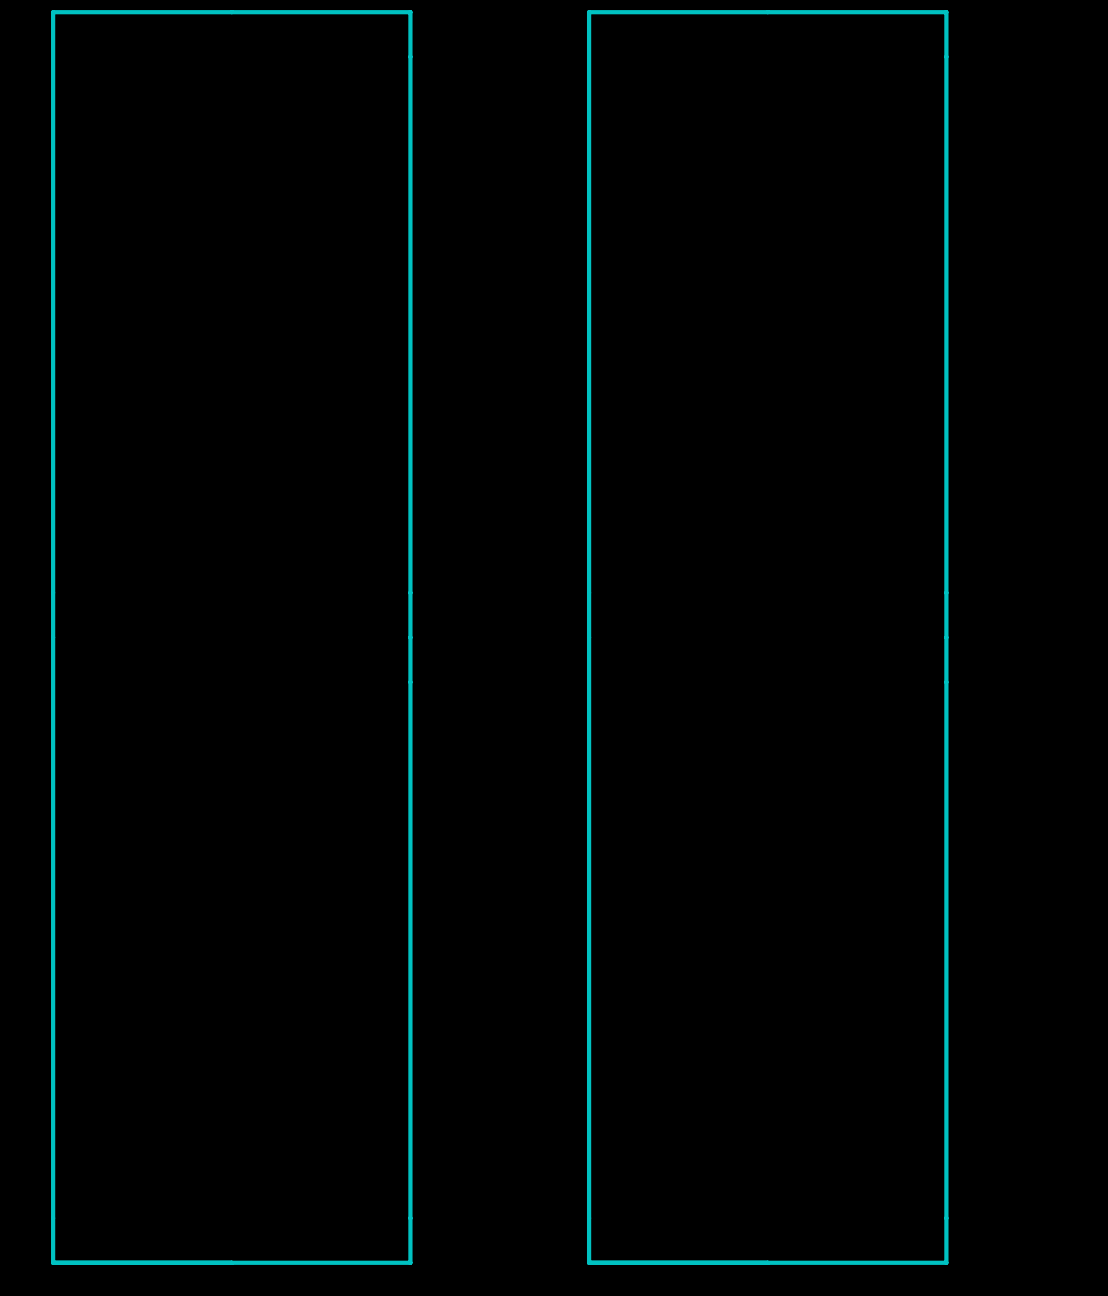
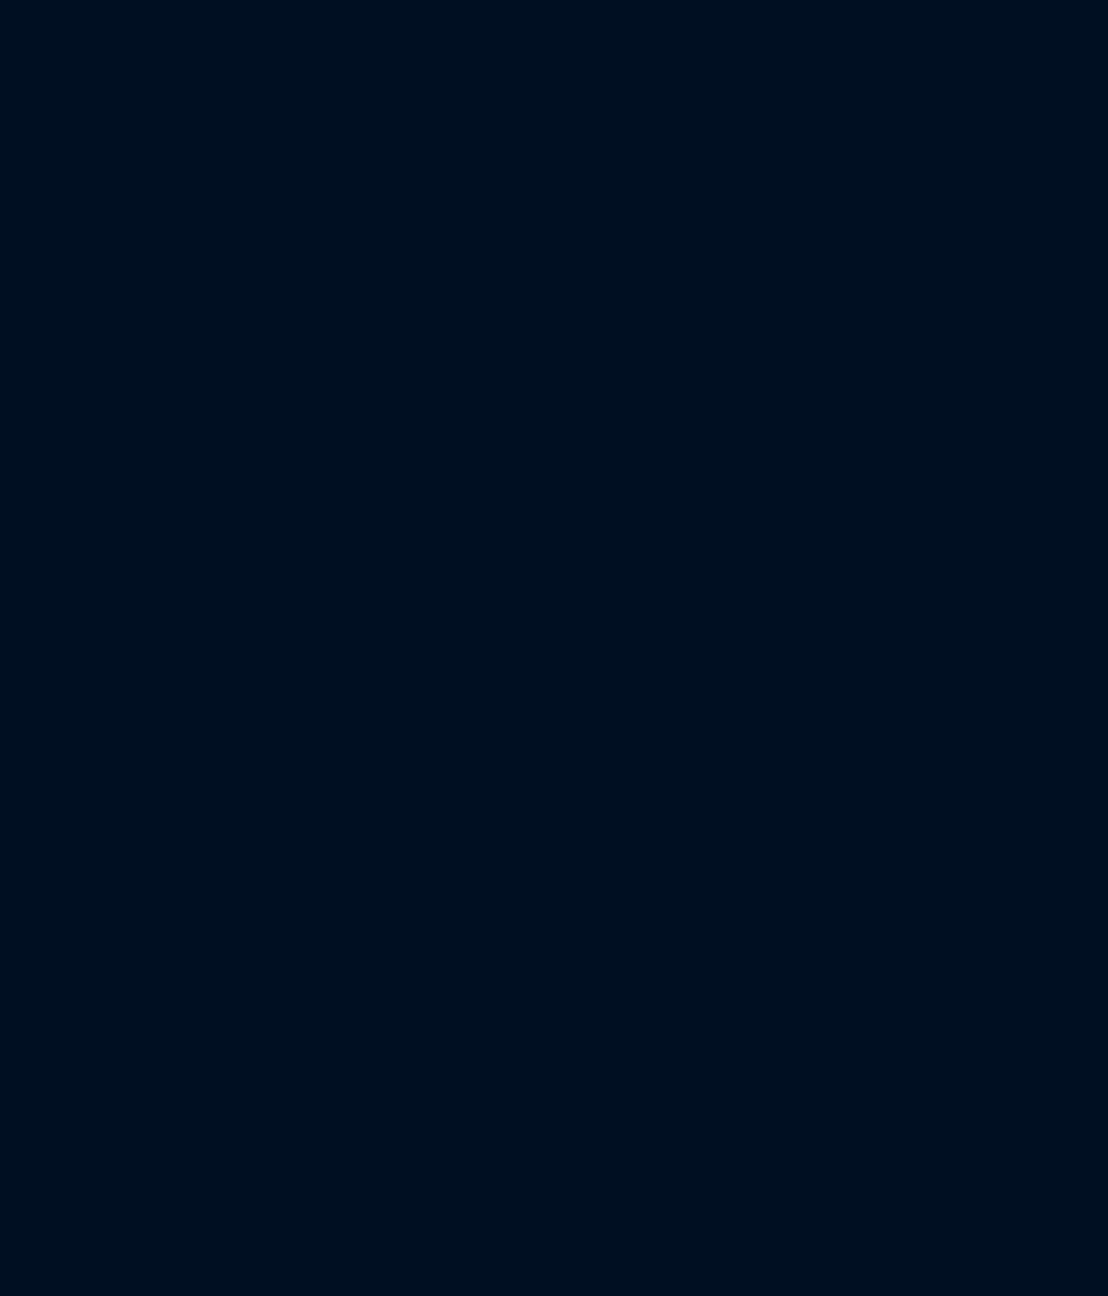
line: (410, 12) (53, 12) (53, 1262) (410, 1262) (410, 12) -> none
line: (946, 12) (946, 1262) (589, 1262) (589, 12) (946, 12) -> none

